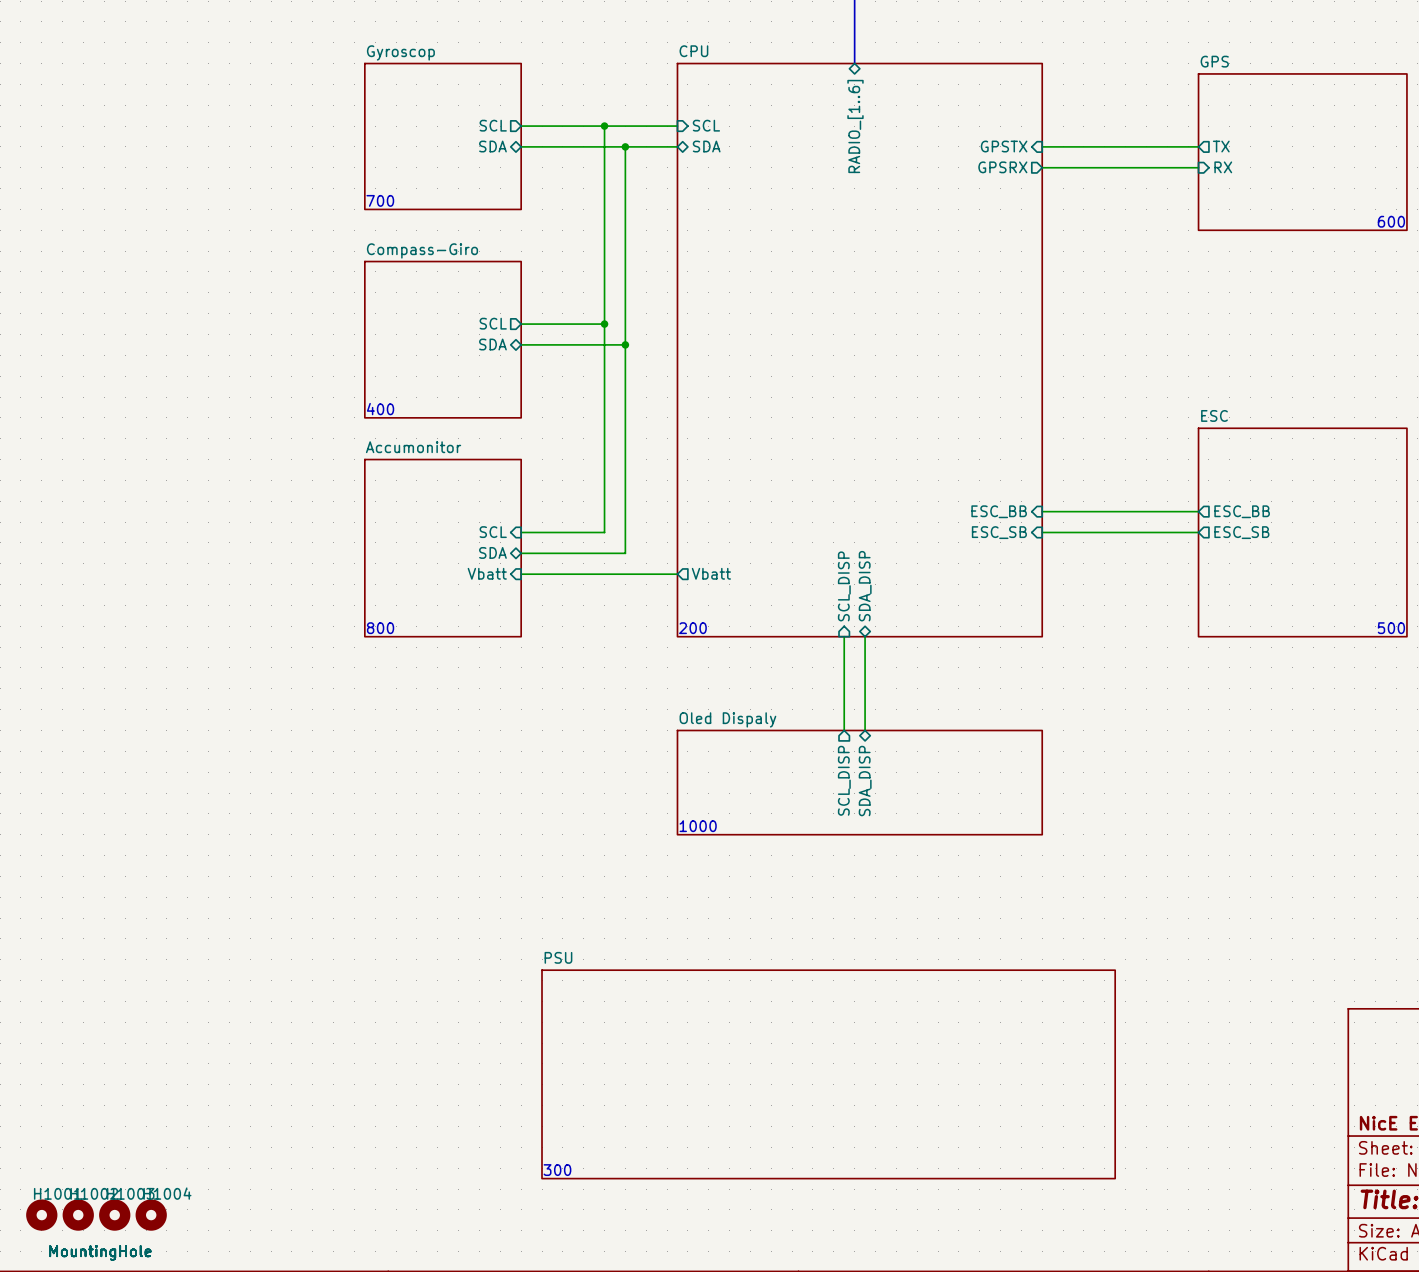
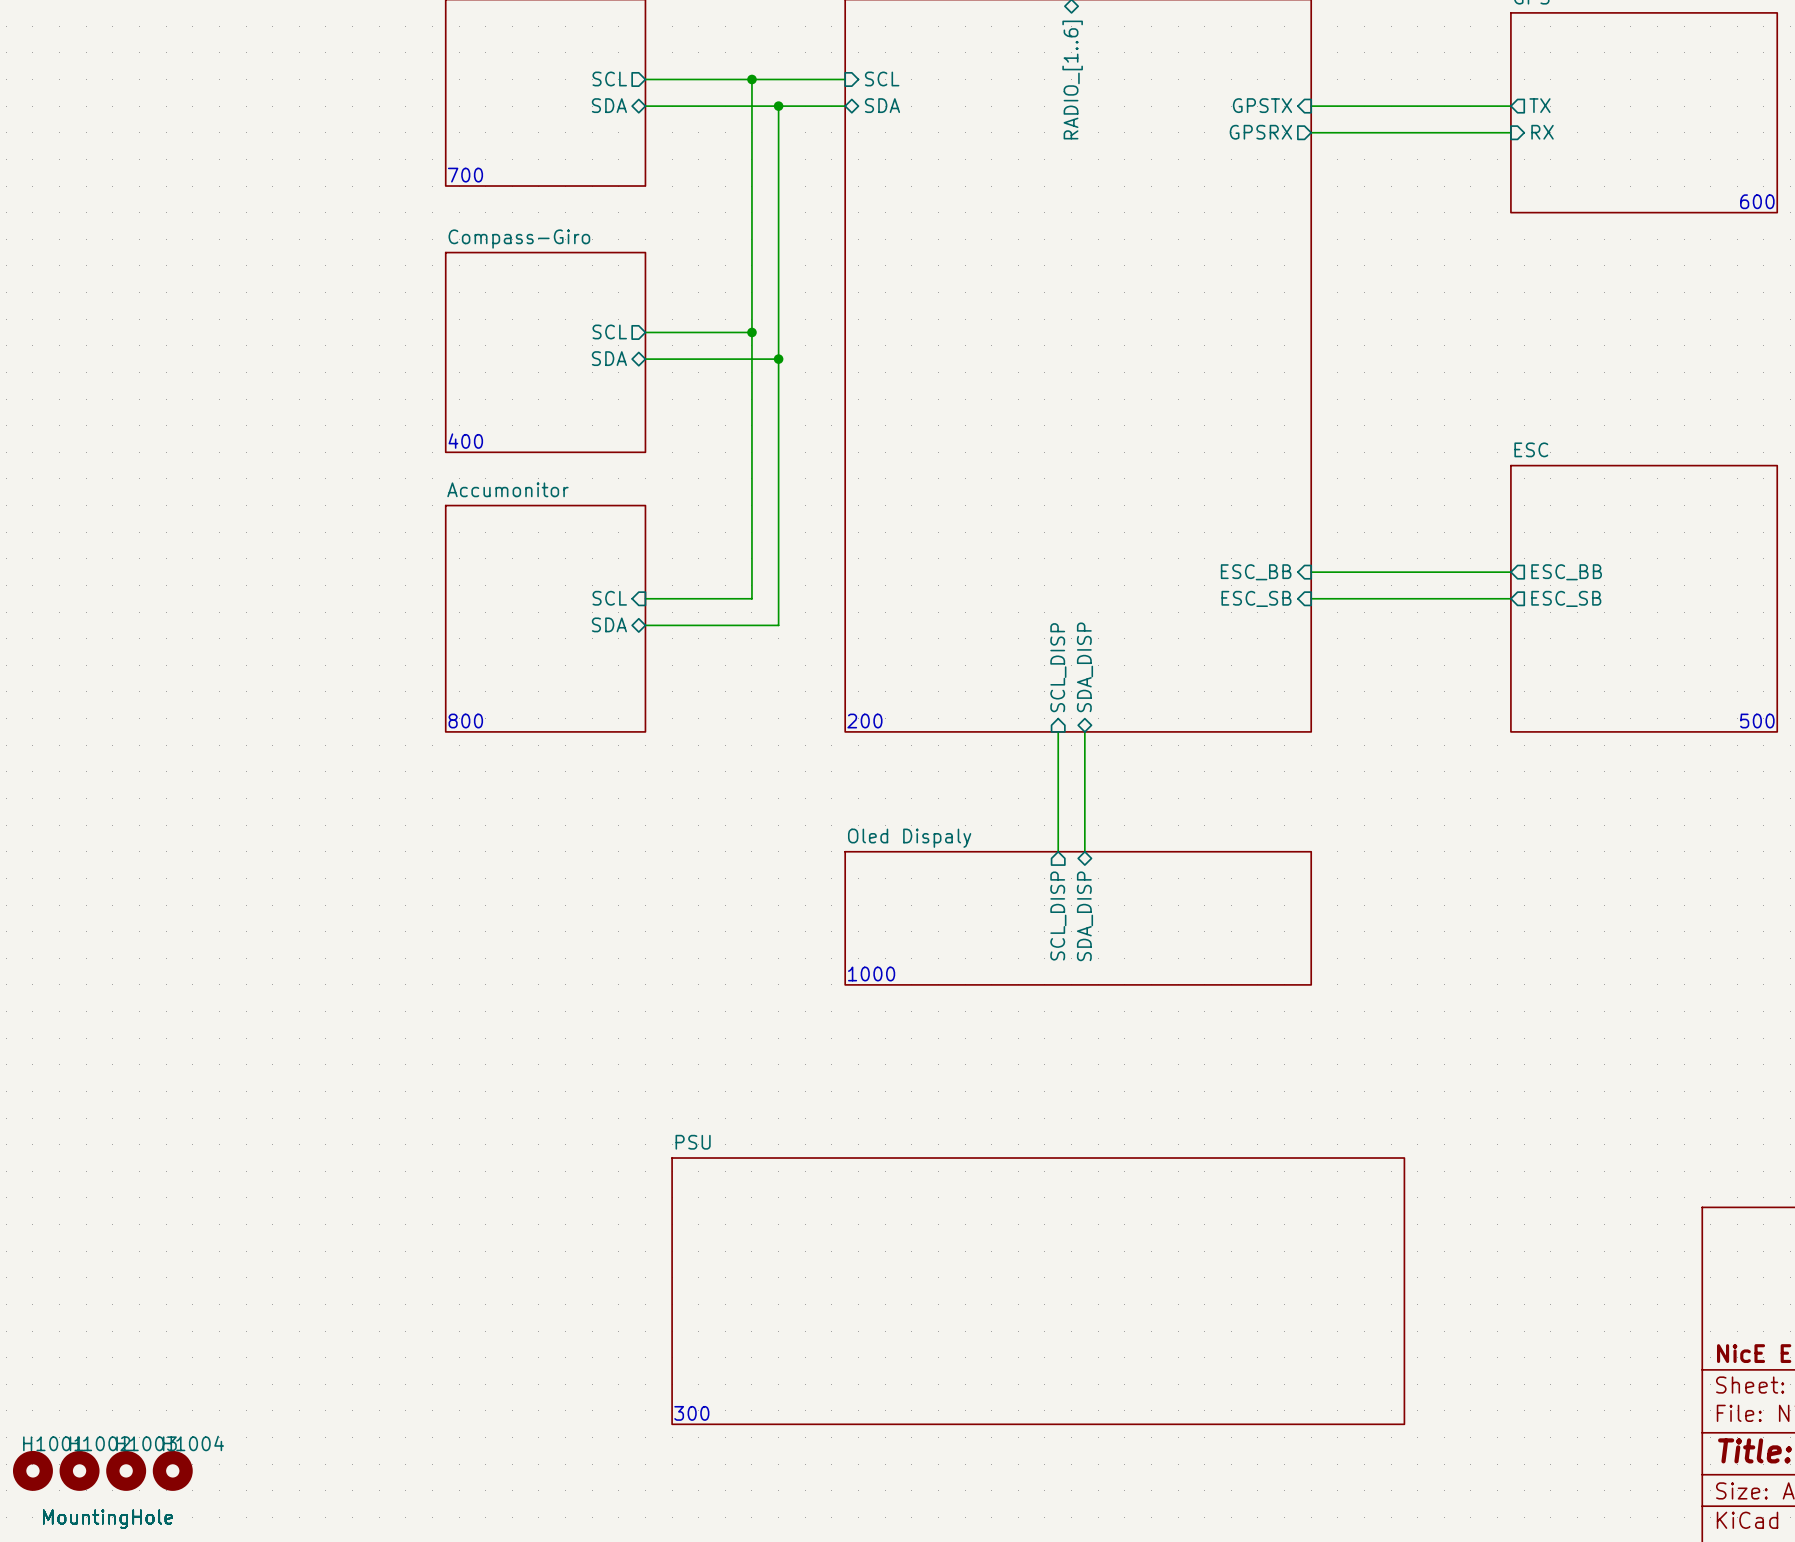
sheet pin: Vbatt (487, 573) -> none
sheet pin: Vbatt (711, 573) -> none
wire: (521, 574) (677, 574) -> none

